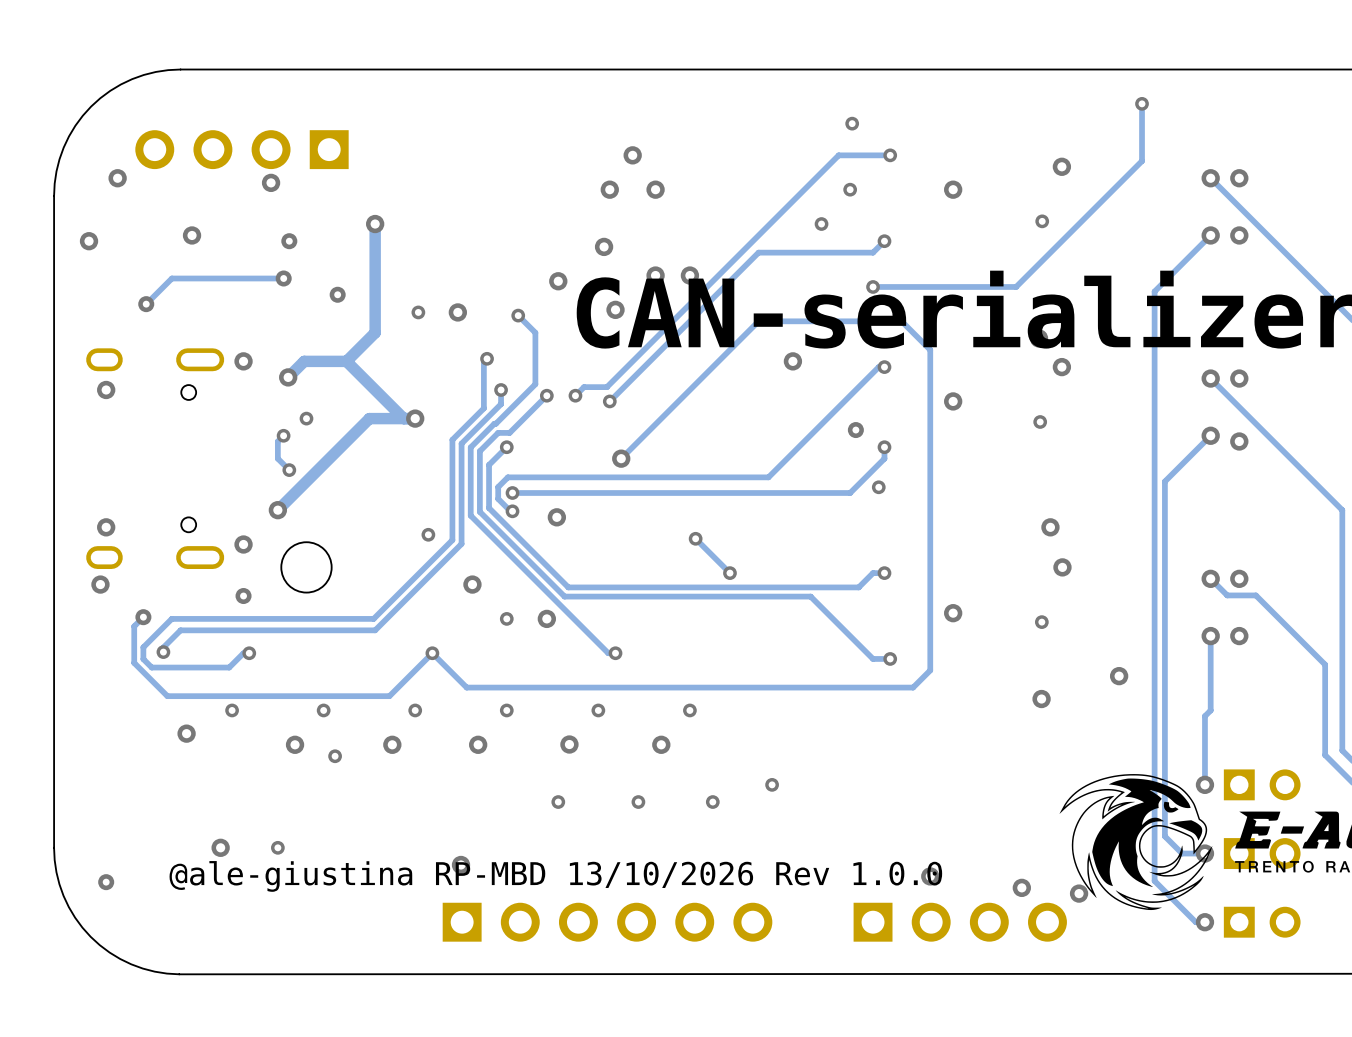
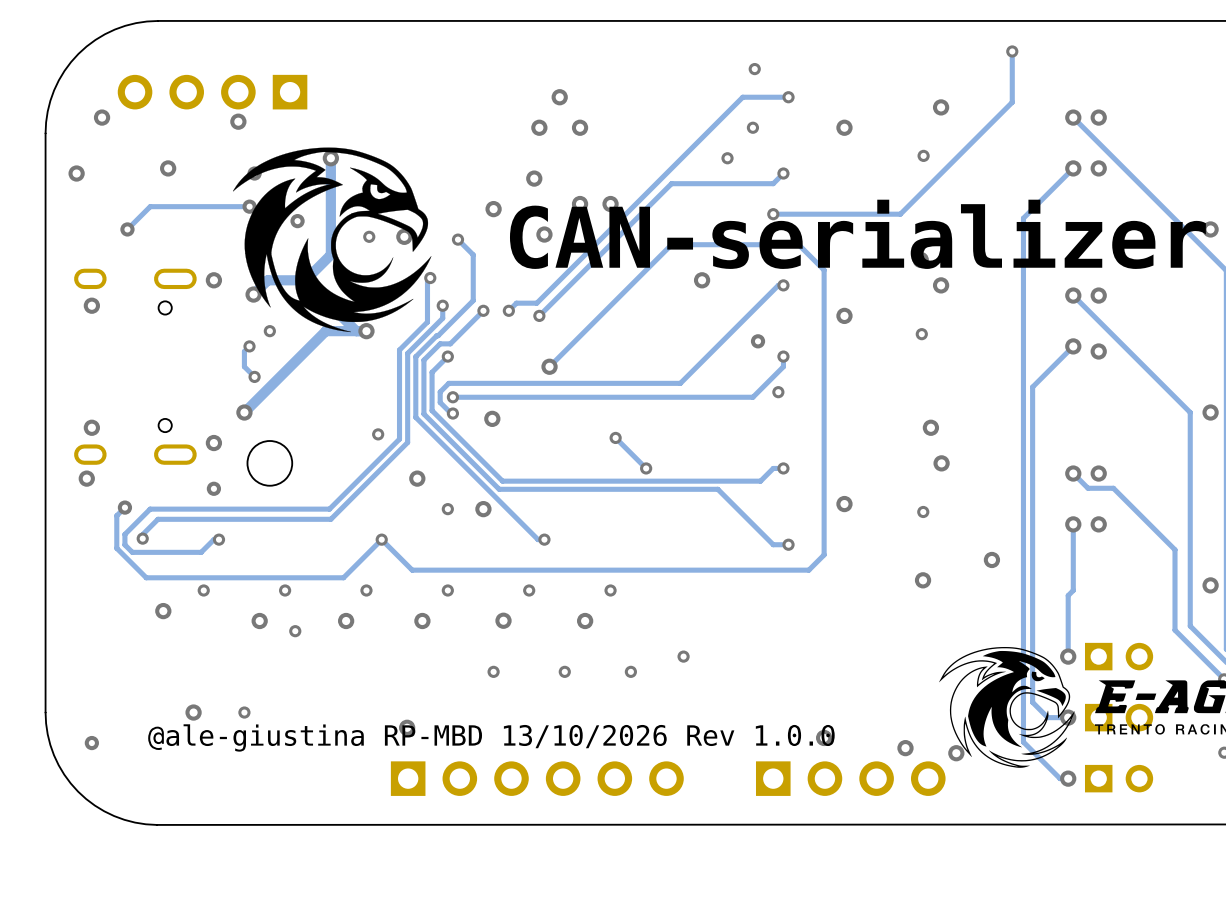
drawing: none -> [232, 147, 432, 333]

